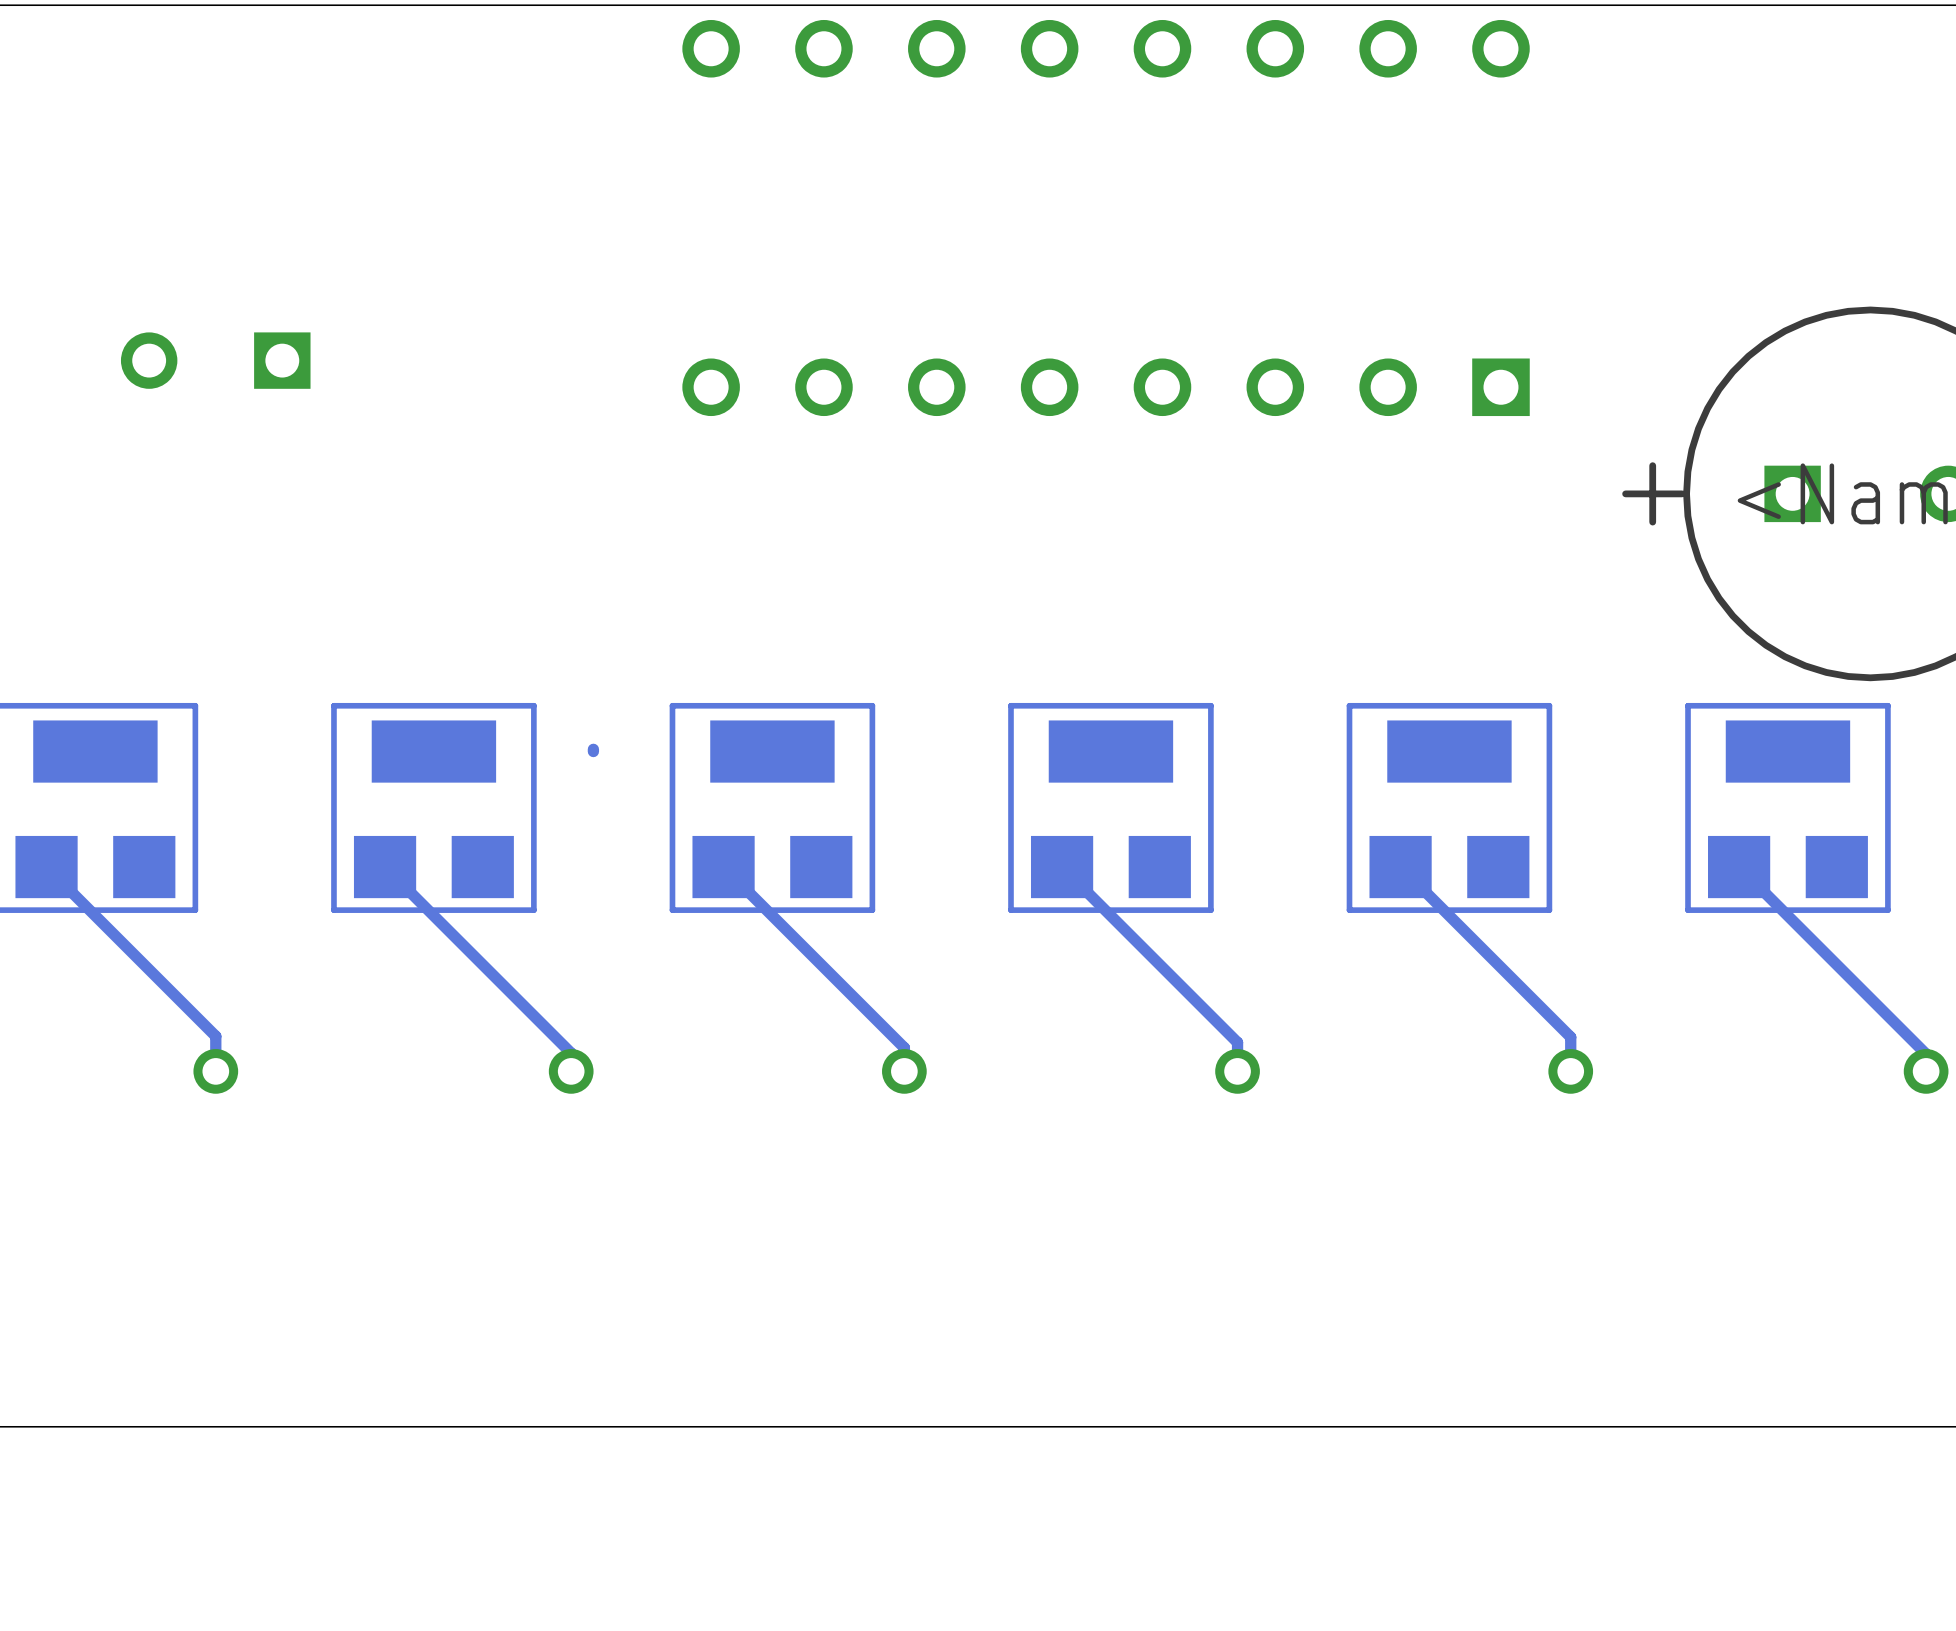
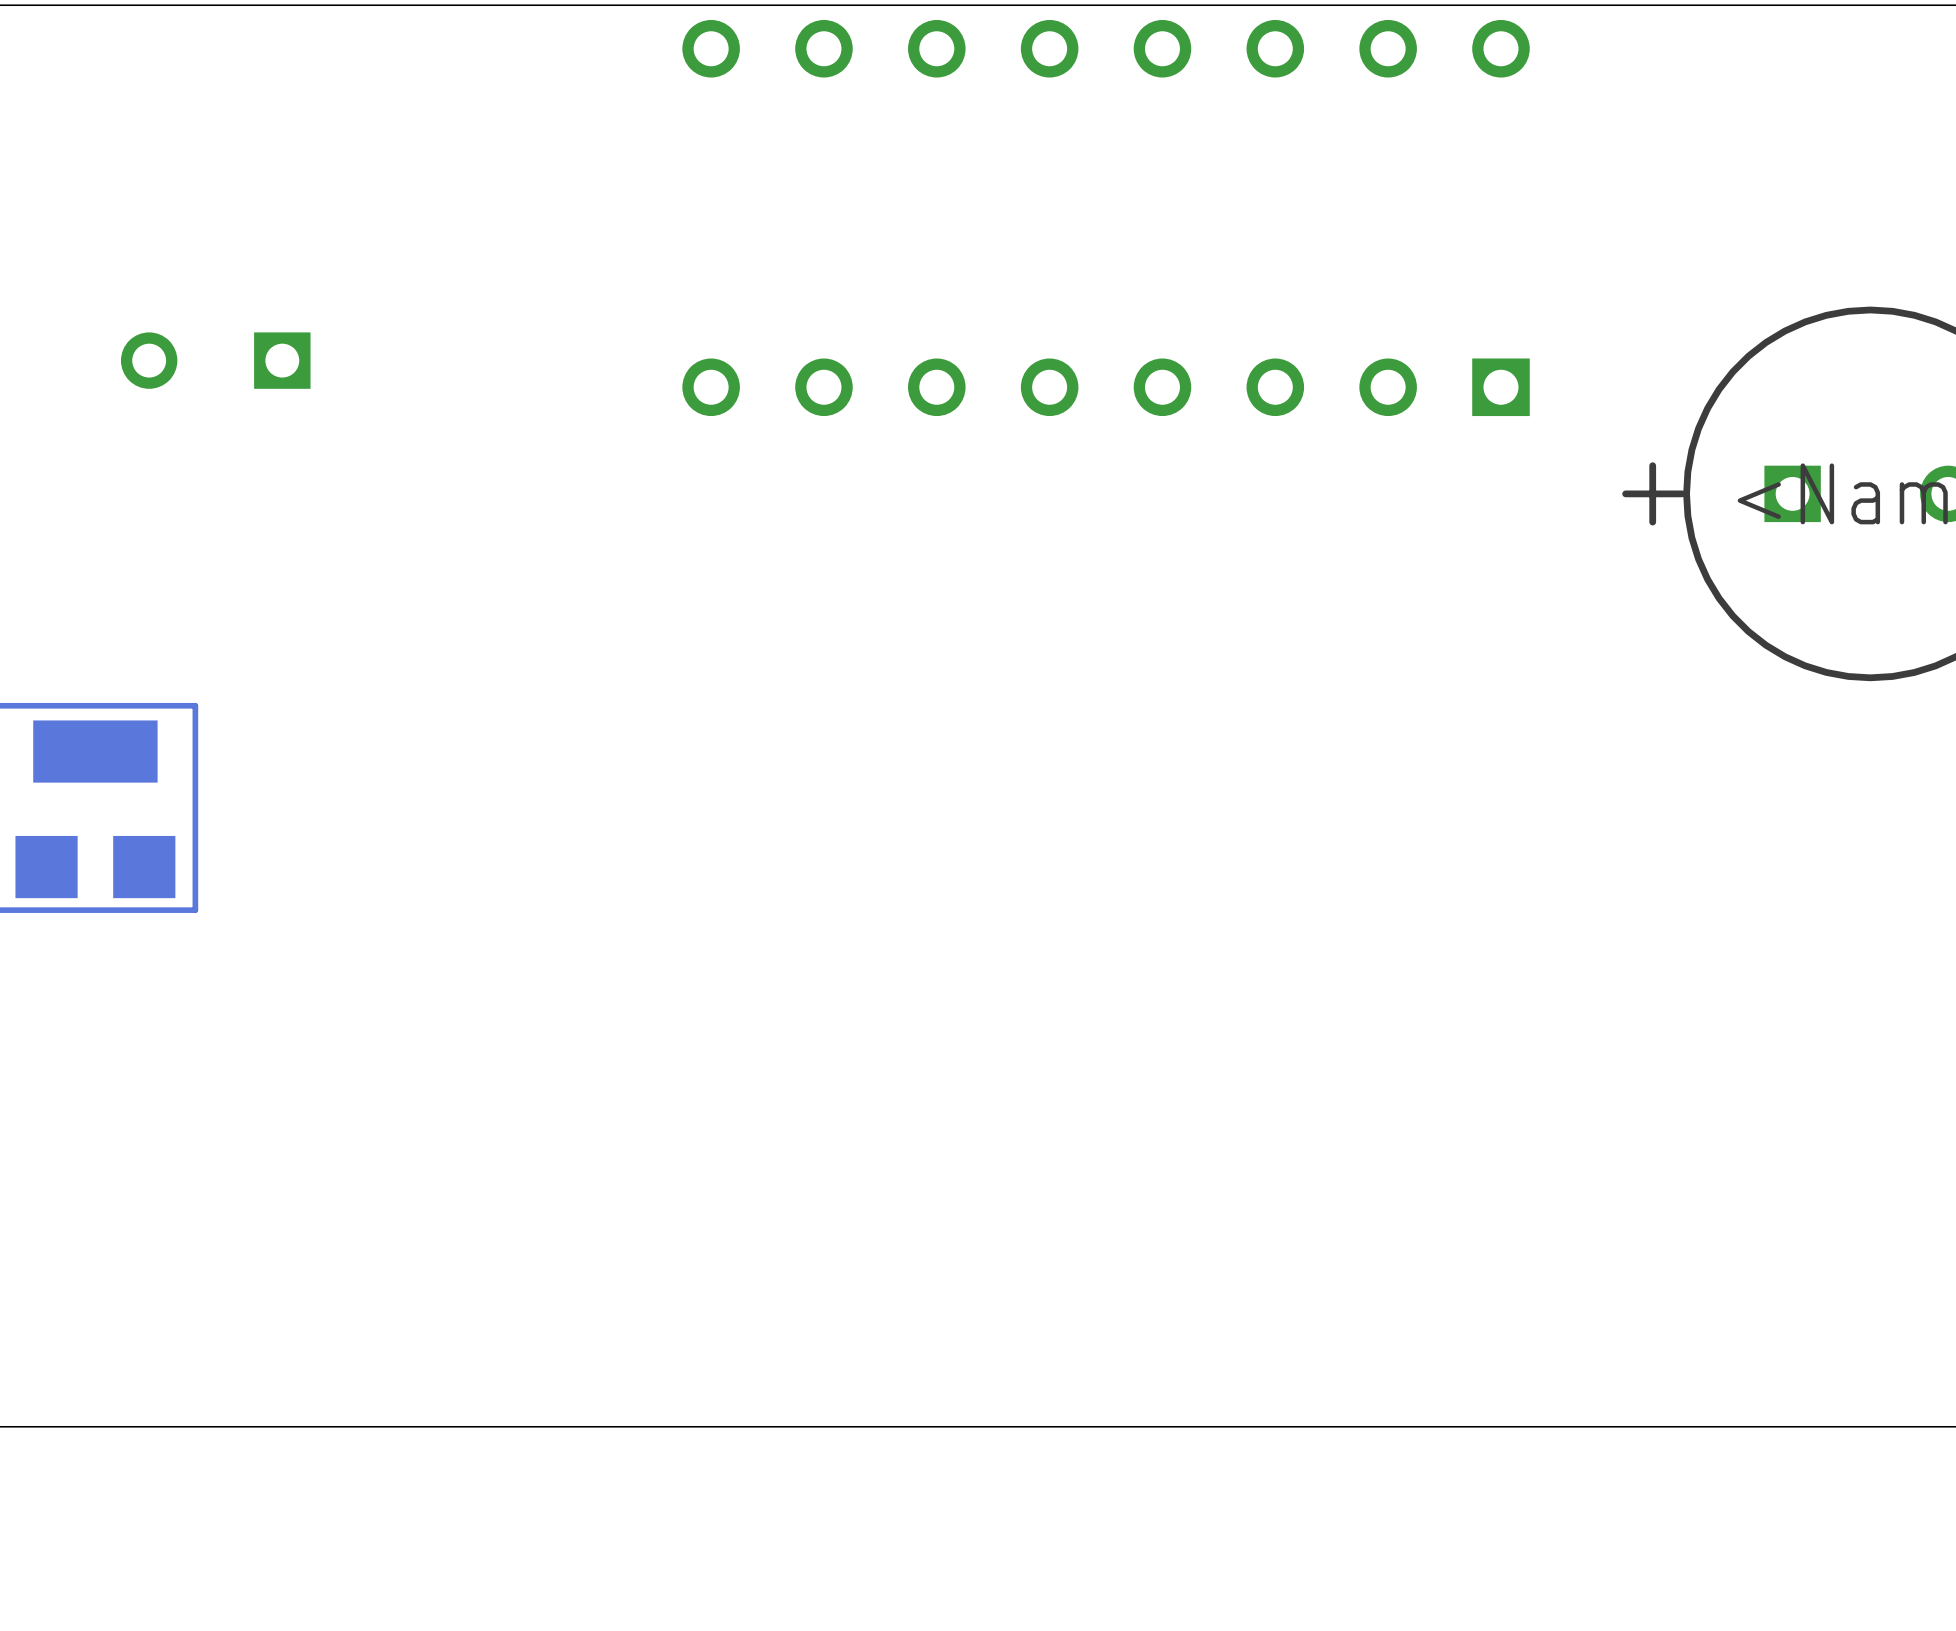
track: (593, 749) (593, 751) -> none
part: (433, 807) -> none
part: (772, 807) -> none
part: (1110, 807) -> none
part: (1449, 807) -> none
part: (1787, 807) -> none
track: (46, 867) (215, 1036) (215, 1071) -> none
track: (385, 867) (571, 1053) (571, 1071) -> none
track: (723, 867) (904, 1047) (904, 1071) -> none
track: (1062, 867) (1237, 1042) (1237, 1071) -> none
track: (1400, 867) (1570, 1037) (1570, 1071) -> none
track: (1739, 867) (1926, 1054) (1926, 1071) -> none
via: (215, 1071) -> none
via: (571, 1071) -> none
via: (904, 1071) -> none
via: (1237, 1071) -> none
via: (1570, 1071) -> none
via: (1926, 1071) -> none

